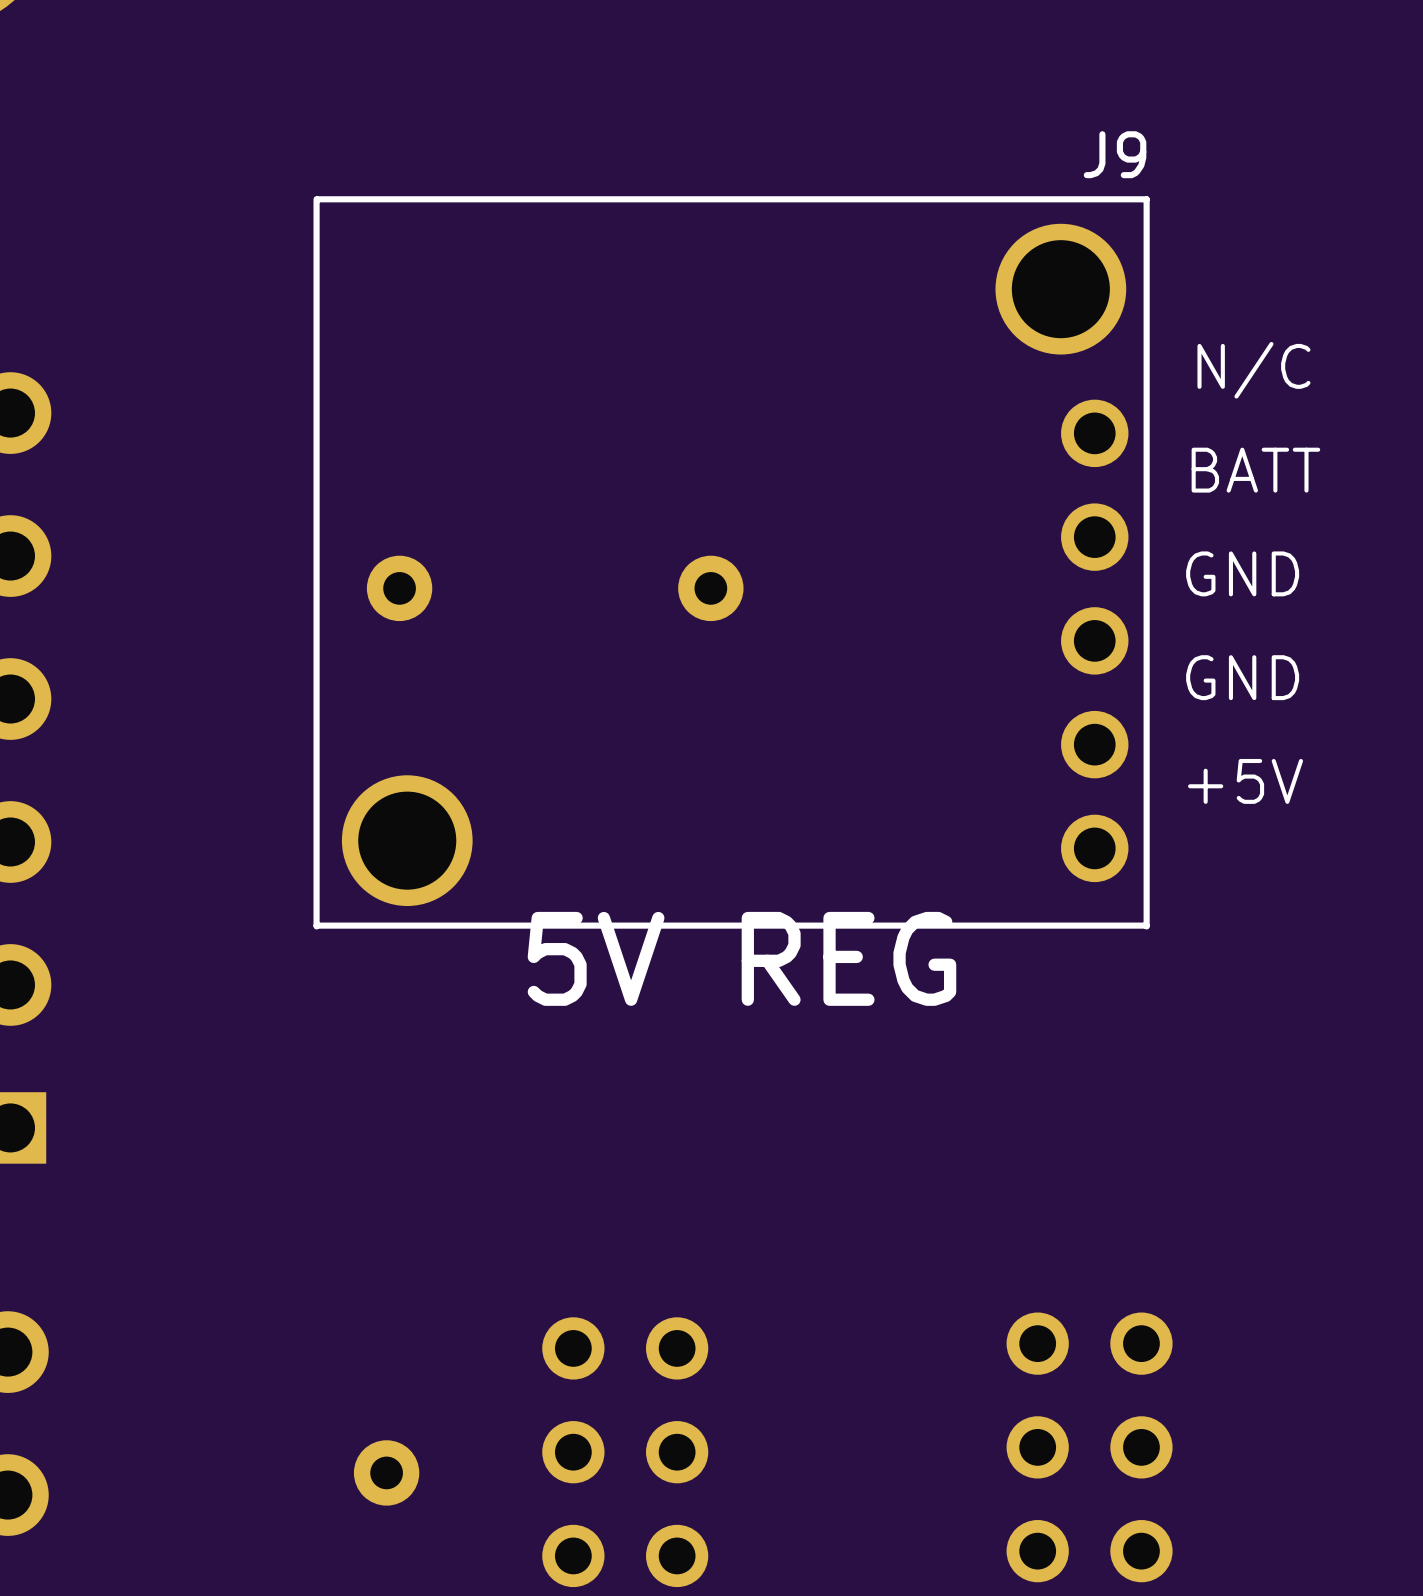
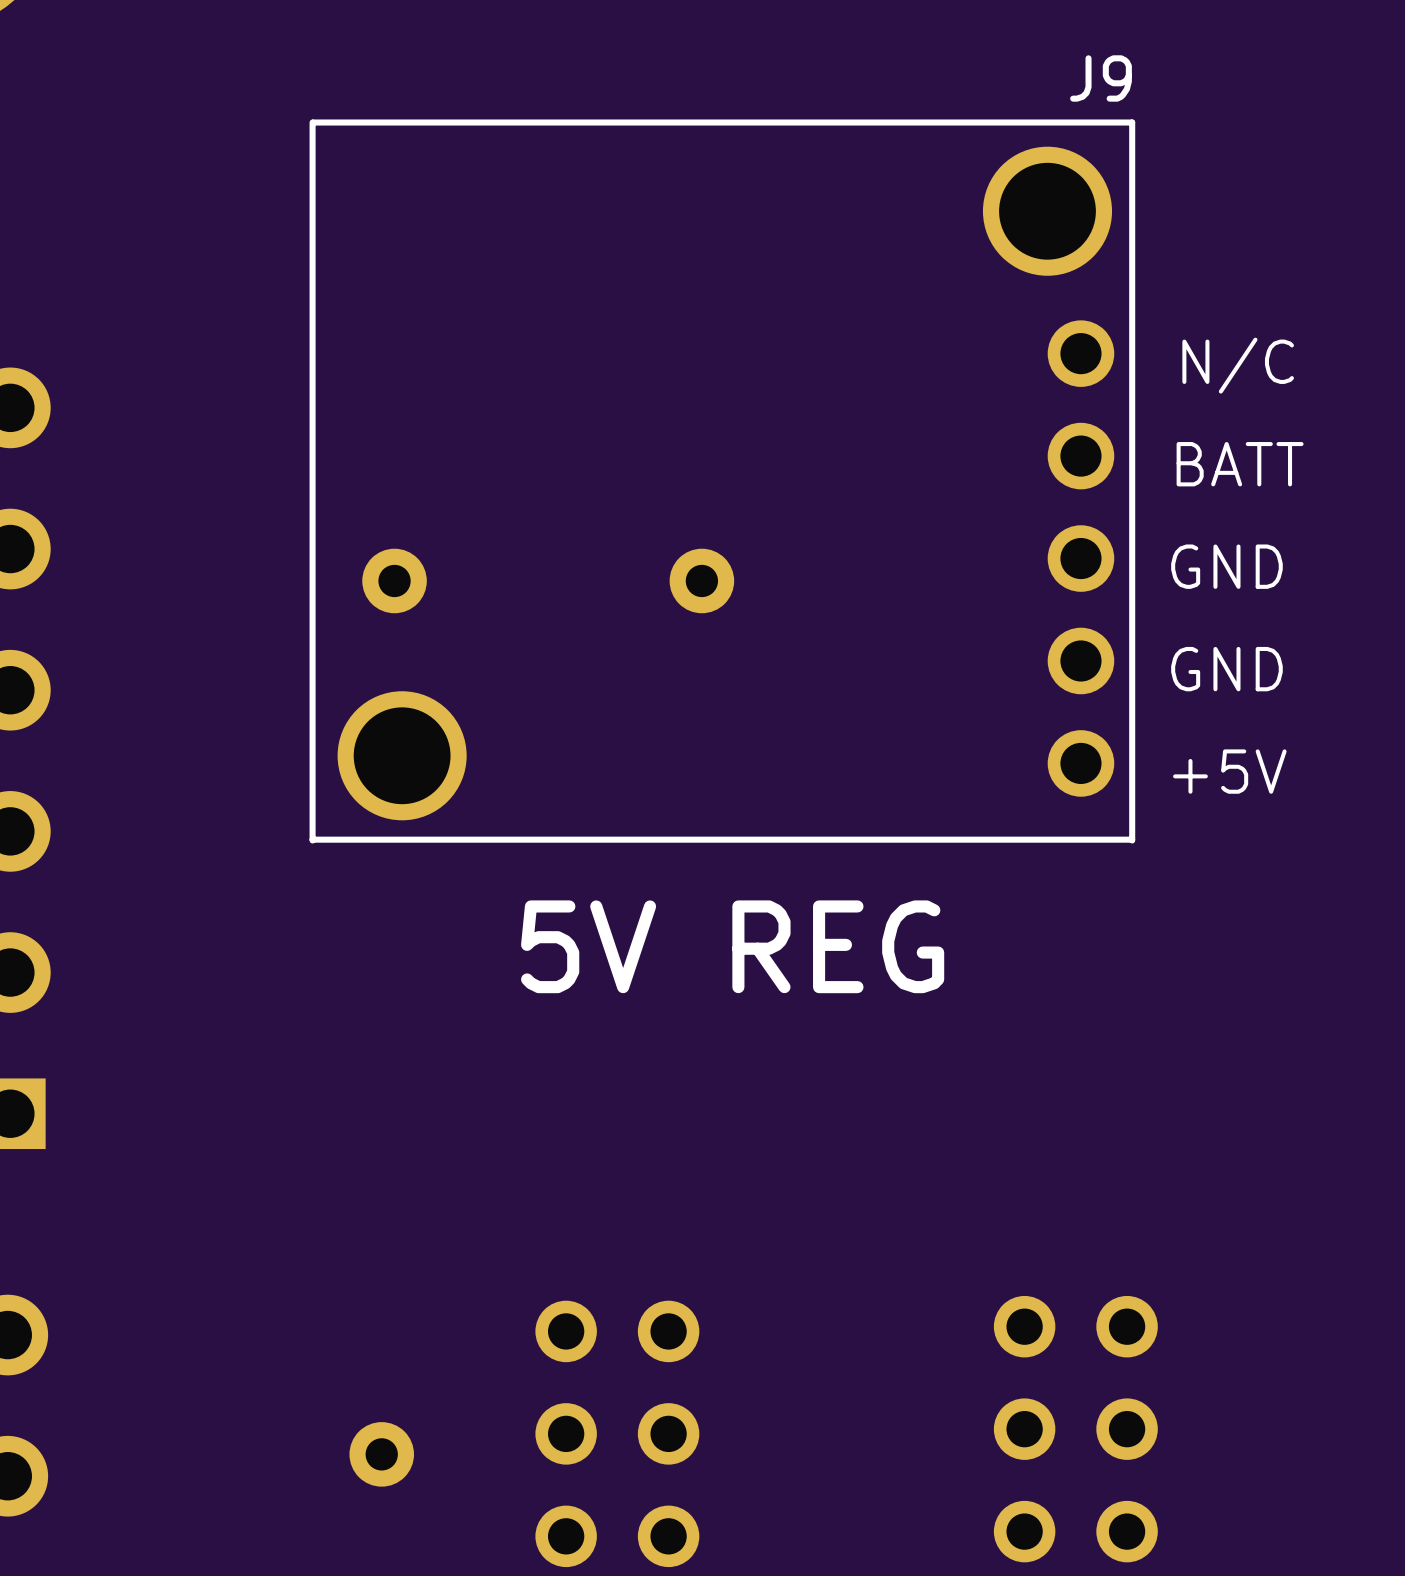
J9 position: (731, 562) -> (722, 481)

